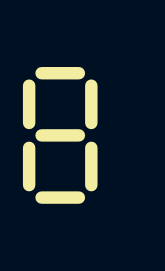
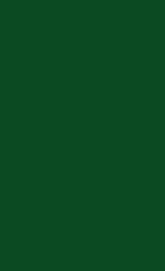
line: (41, 73) (78, 73) -> none
line: (29, 85) (29, 122) -> none
line: (91, 85) (91, 122) -> none
line: (41, 135) (78, 135) -> none
line: (29, 147) (29, 185) -> none
line: (91, 147) (91, 185) -> none
line: (41, 197) (78, 197) -> none

